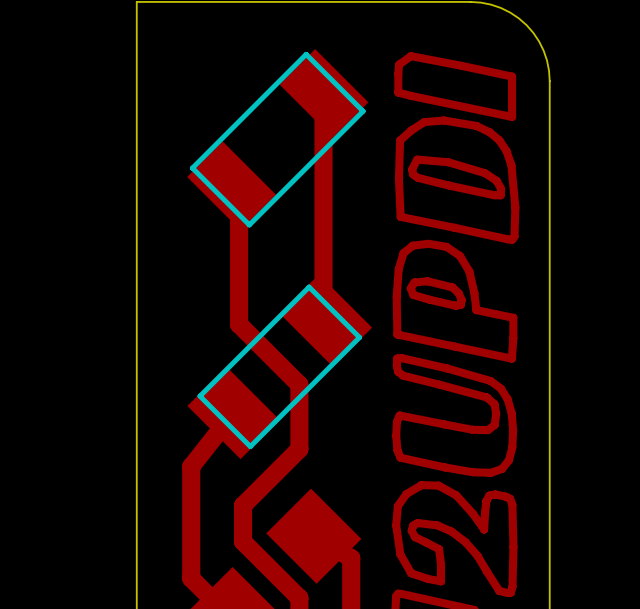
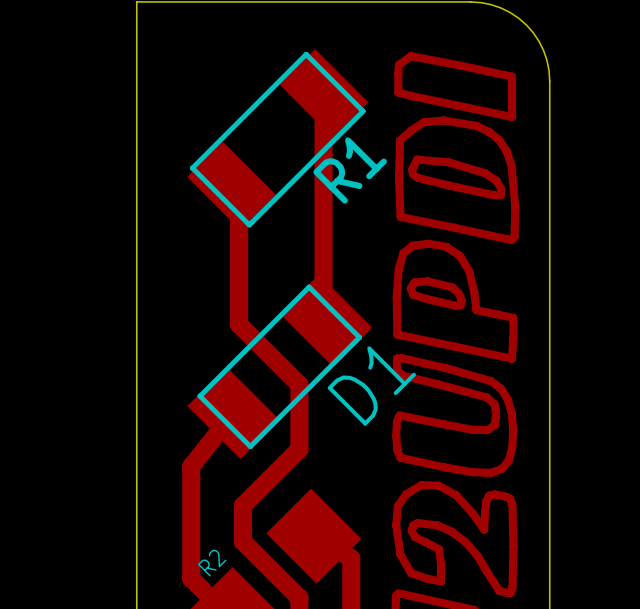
R1 name: none -> R1 (350, 170)
D1 name: none -> D1 (371, 385)
R2 name: none -> R2 (212, 563)

